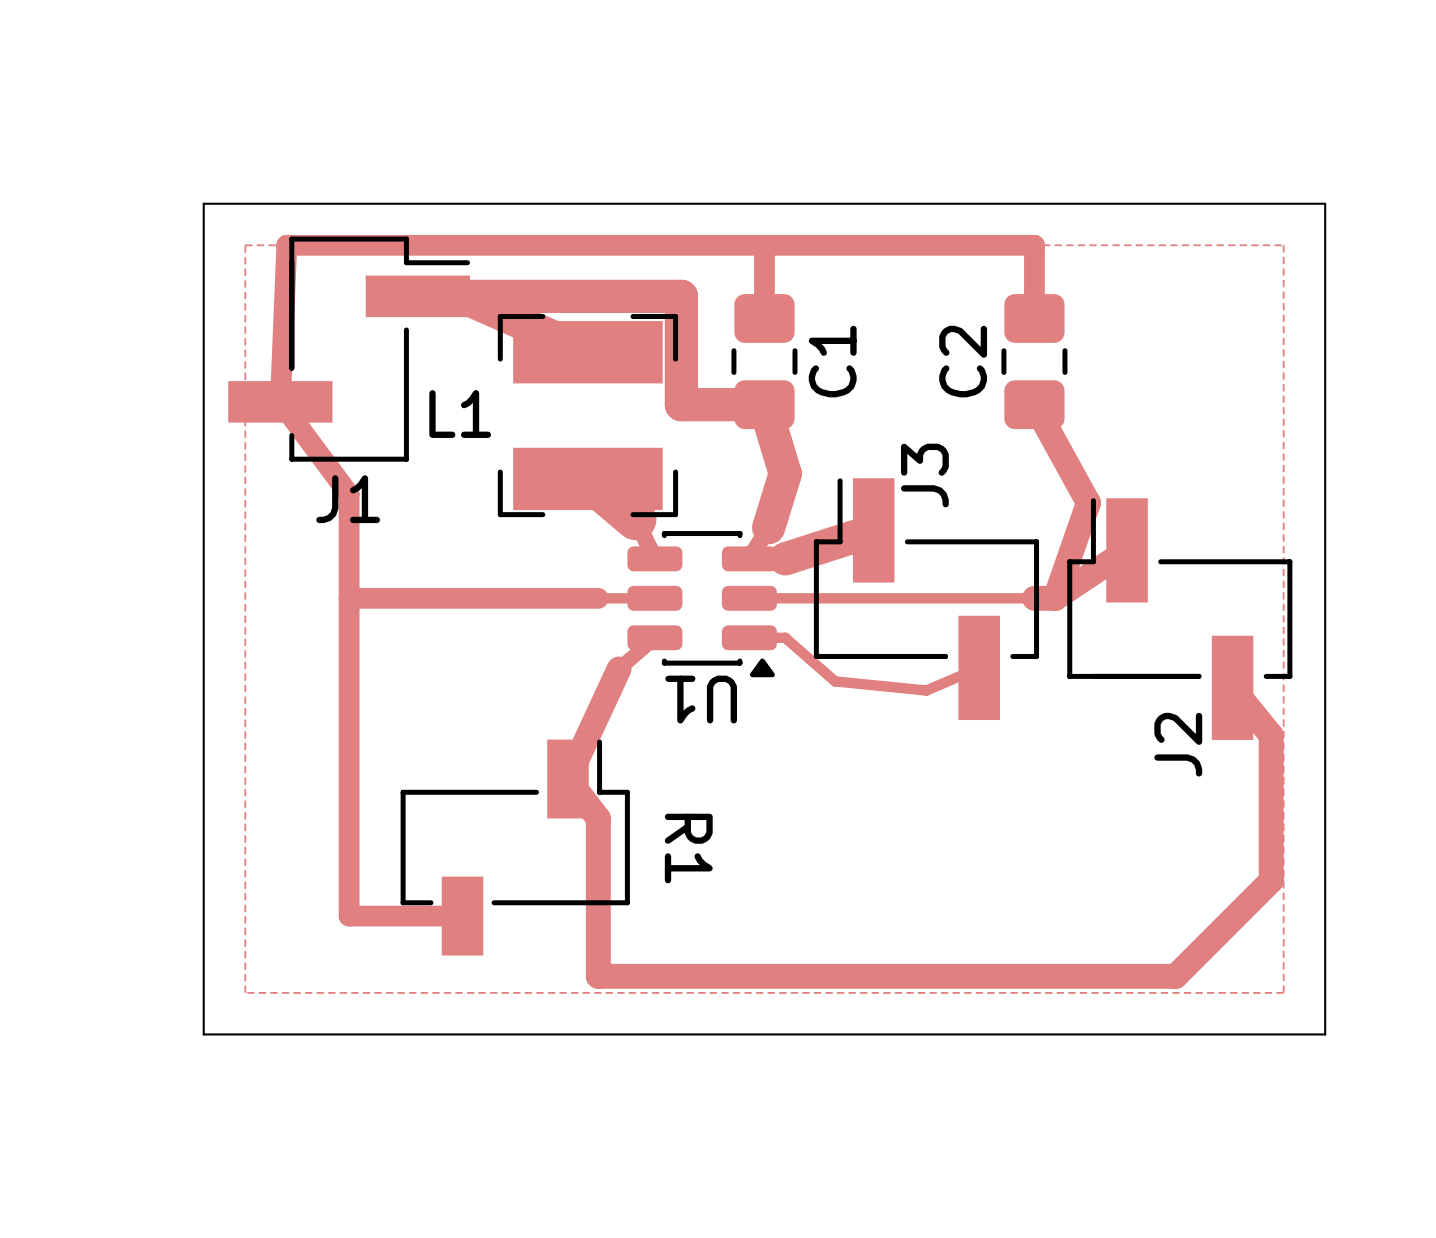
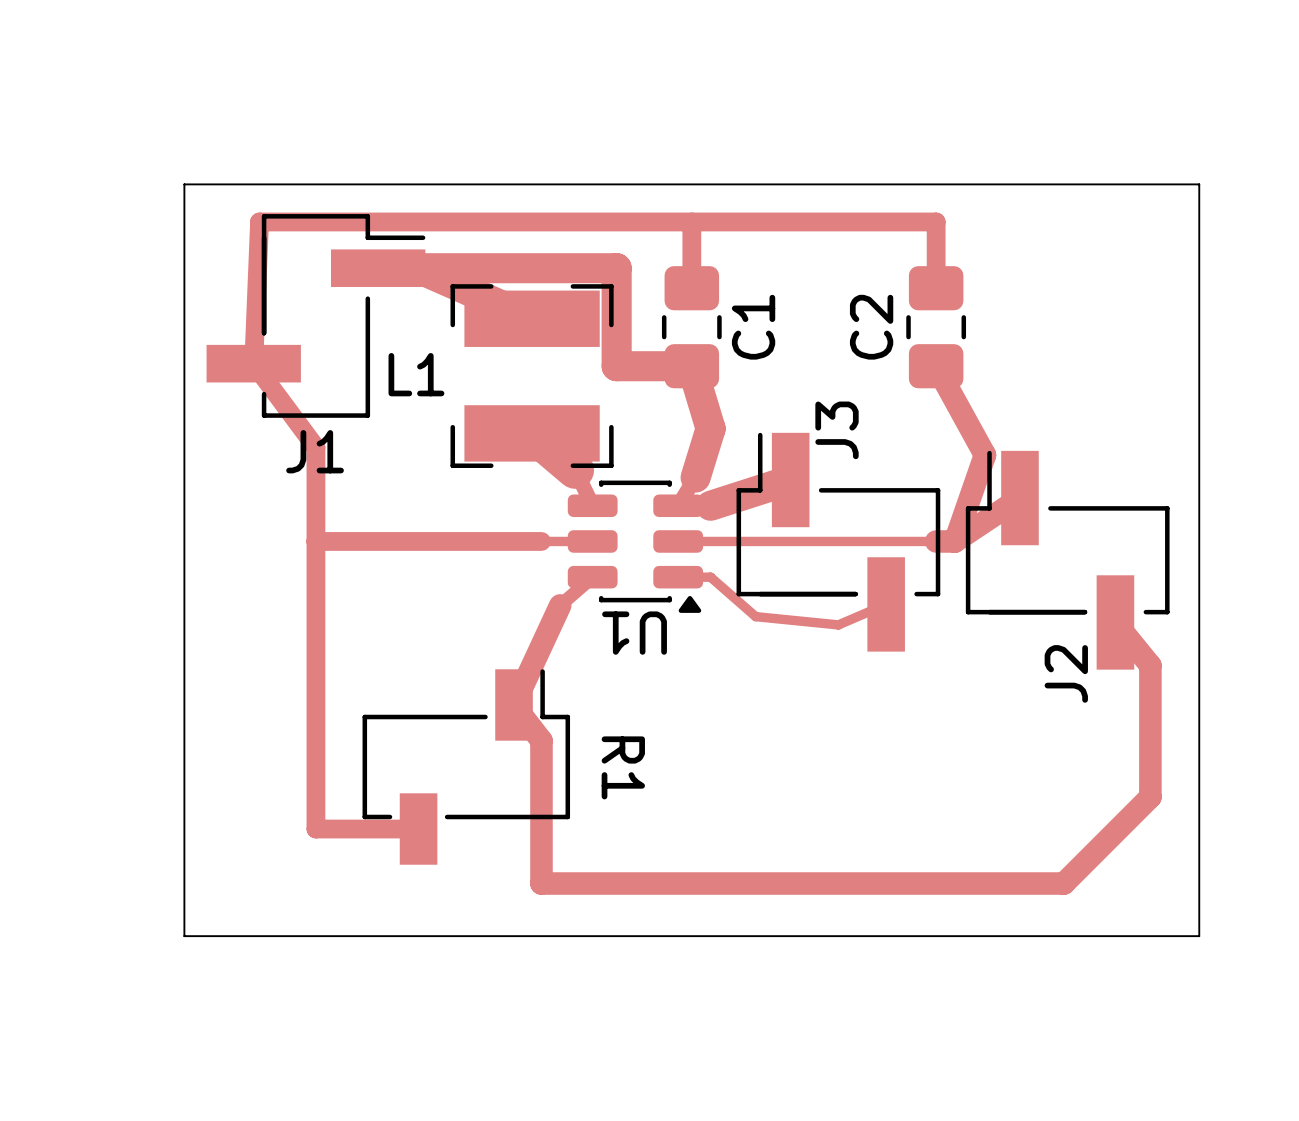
zone outline: (245, 245) (1283, 245) (1283, 992) (245, 992) (245, 245) -> none

